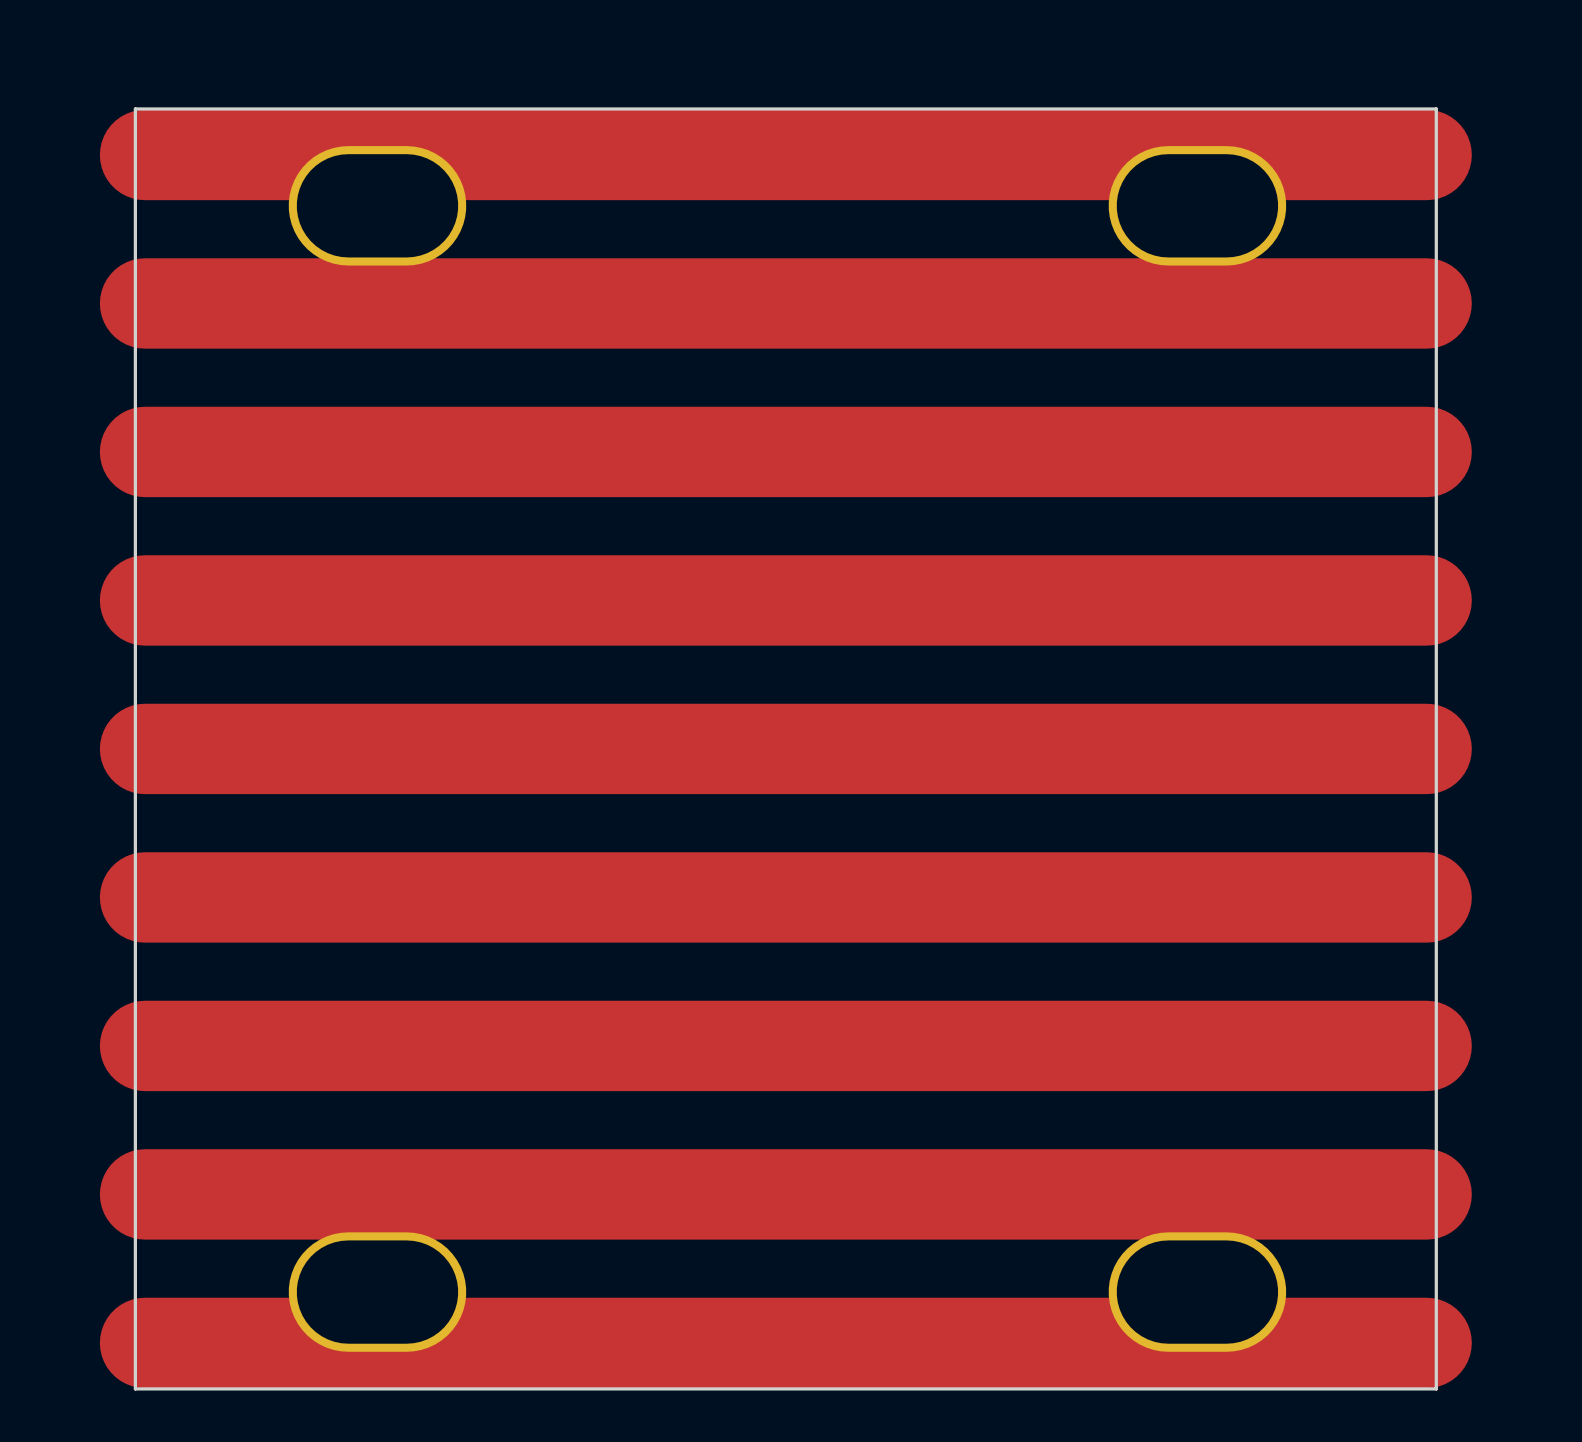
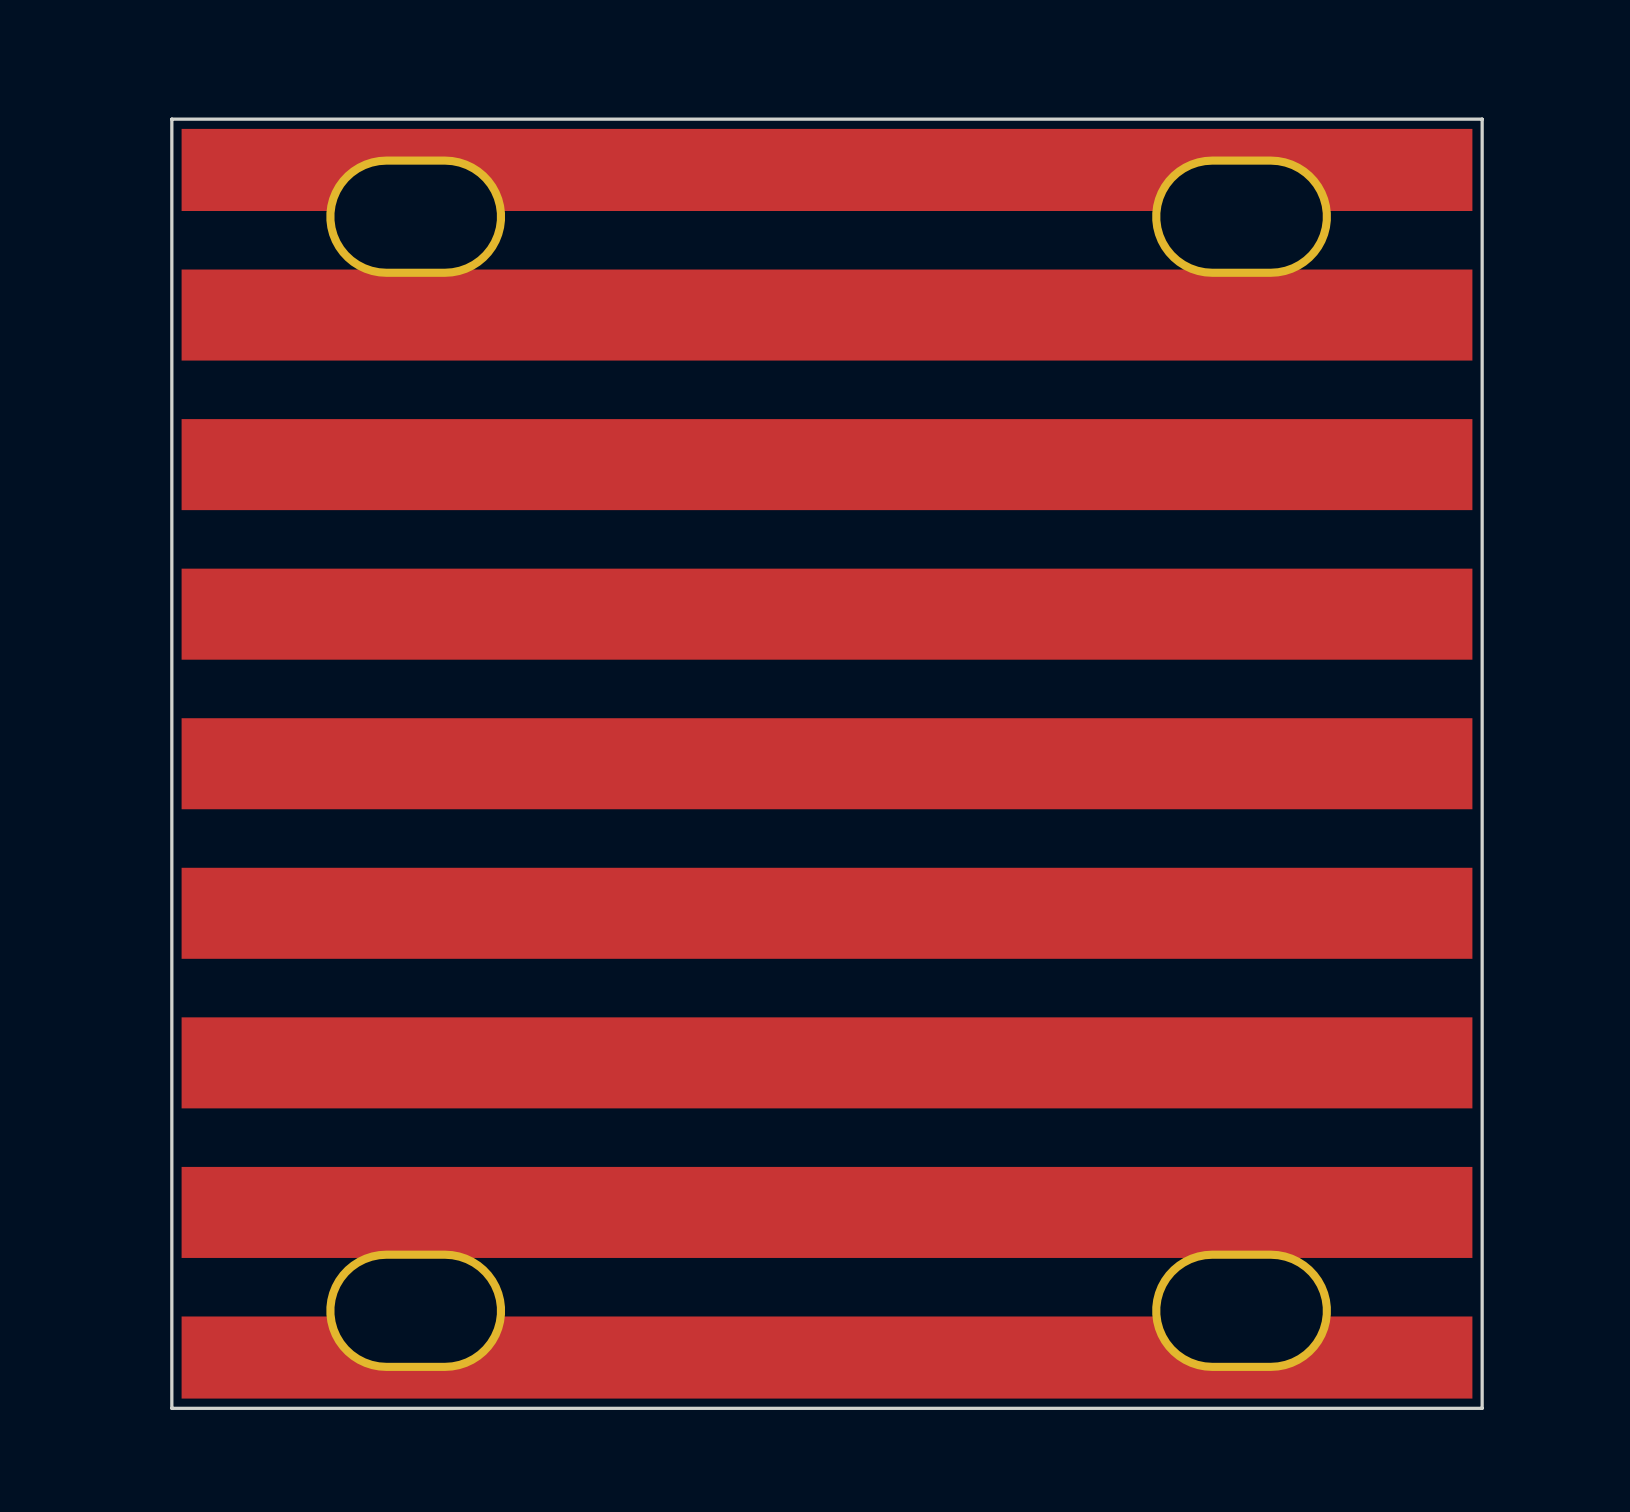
drawing: none -> [181, 128, 1473, 211]
track: (145, 154) (1426, 154) -> none
drawing: none -> [181, 269, 1473, 361]
track: (145, 303) (1426, 303) -> none
drawing: none -> [181, 419, 1473, 511]
track: (145, 451) (1426, 451) -> none
drawing: none -> [181, 568, 1473, 660]
track: (145, 600) (1426, 600) -> none
drawing: none -> [181, 718, 1473, 810]
track: (145, 748) (1426, 748) -> none
drawing: none -> [181, 867, 1473, 959]
track: (145, 897) (1426, 897) -> none
drawing: none -> [181, 1017, 1473, 1109]
track: (145, 1045) (1426, 1045) -> none
drawing: none -> [181, 1166, 1473, 1258]
track: (145, 1194) (1426, 1194) -> none
drawing: none -> [181, 1316, 1473, 1399]
track: (145, 1342) (1426, 1342) -> none

